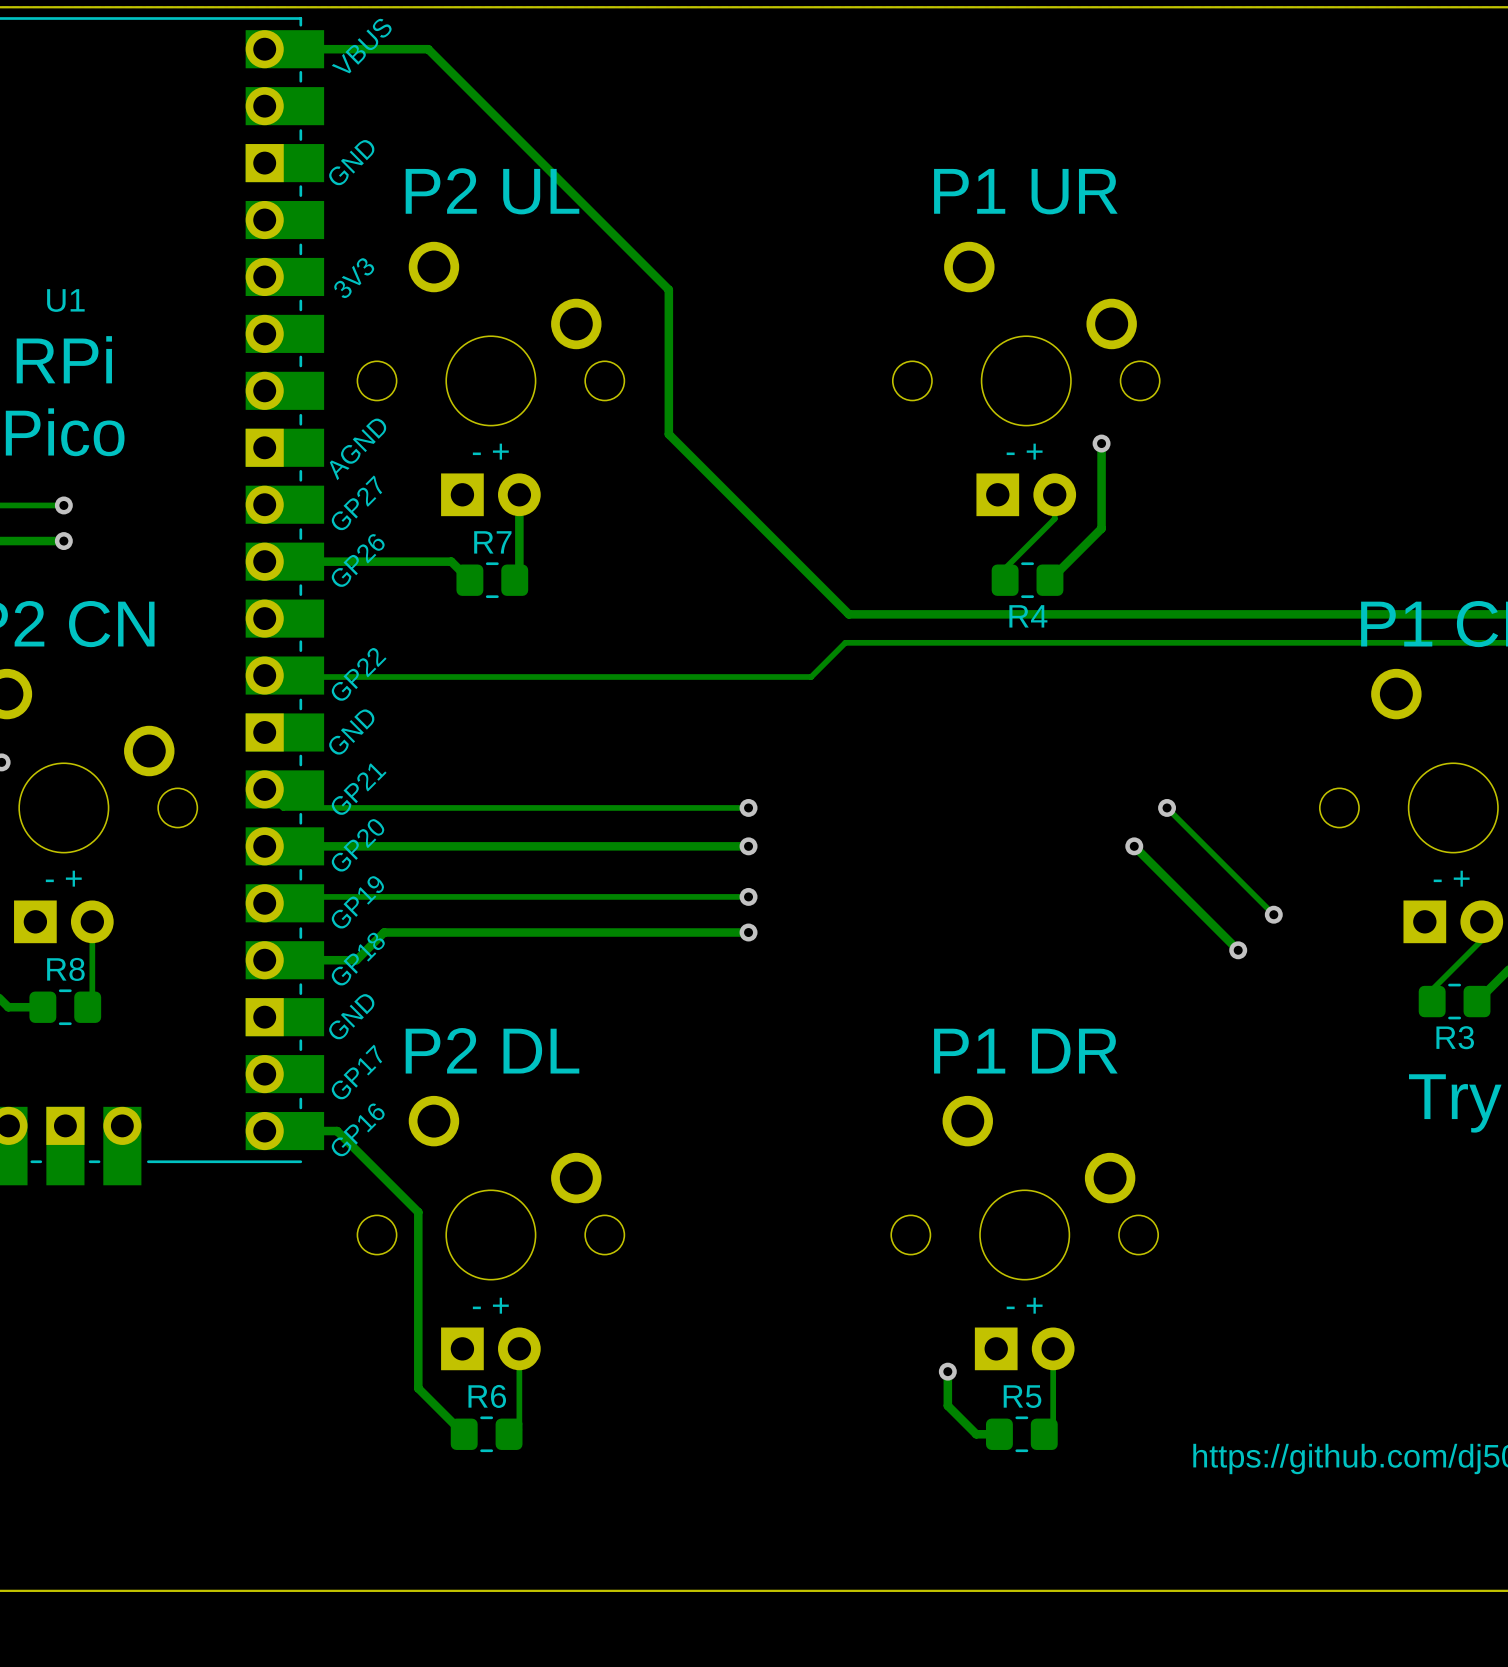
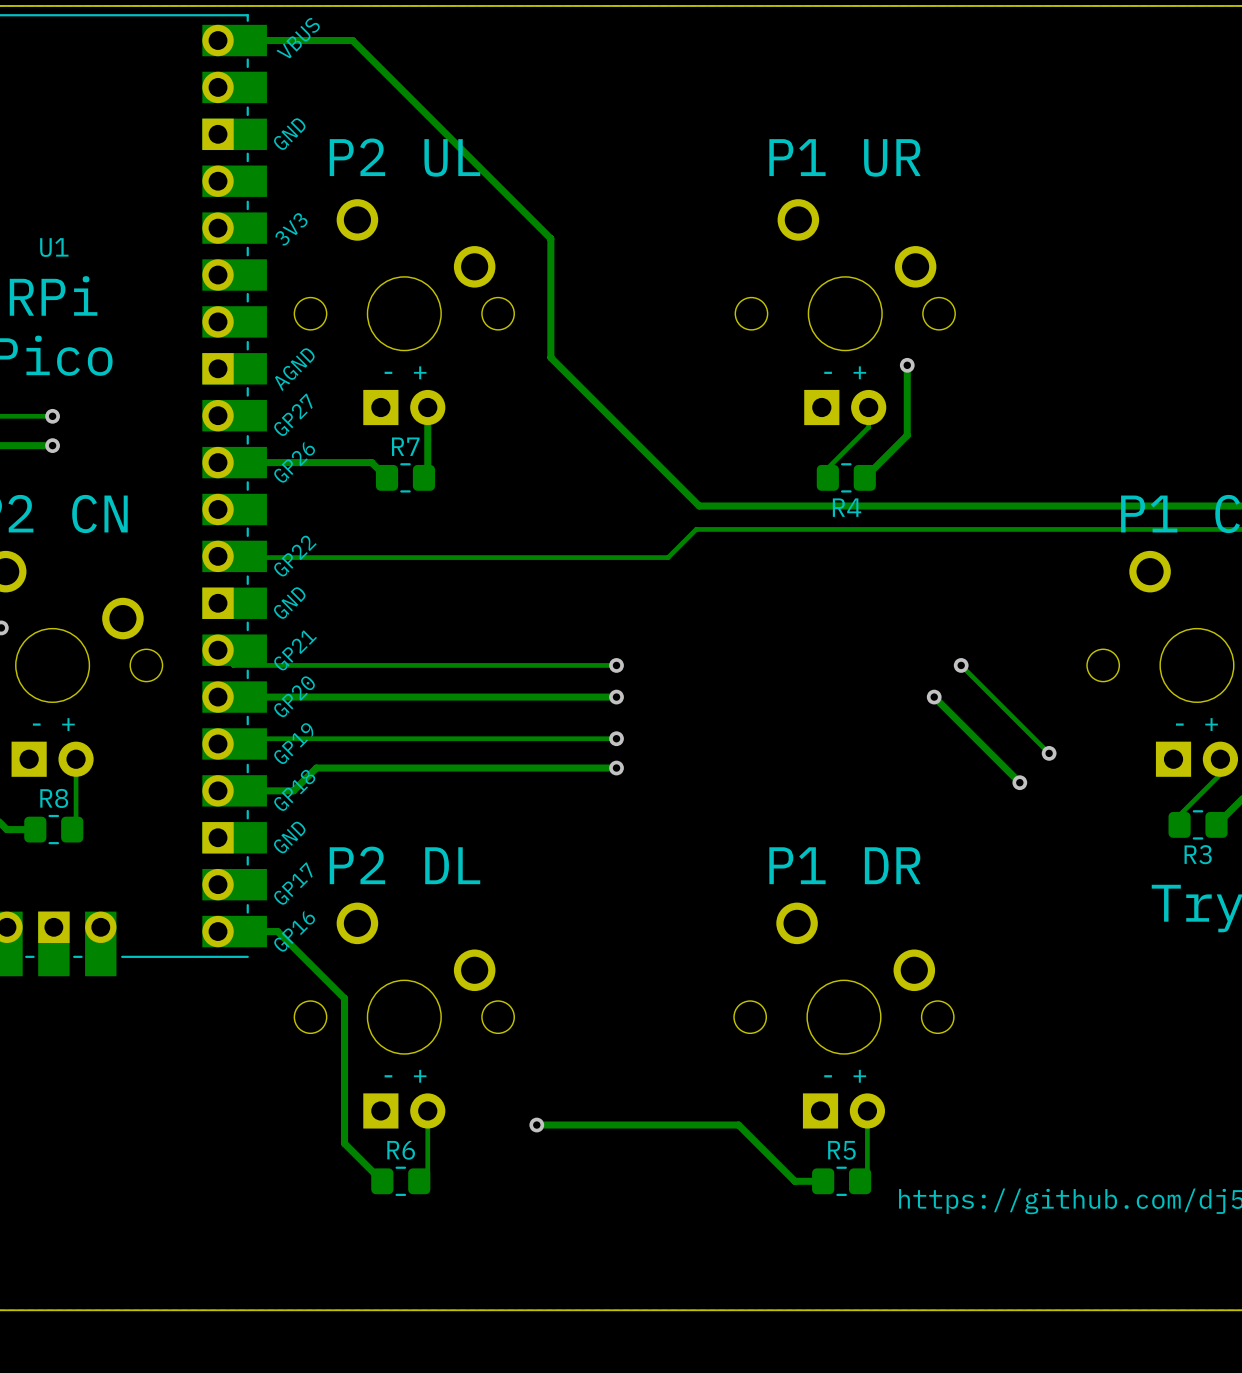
via: none -> (536, 1125)
track: (947, 1371) (947, 1405) (976, 1434) -> (536, 1125) (738, 1125) (794, 1181) (804, 1181)
via: (947, 1371) -> none

